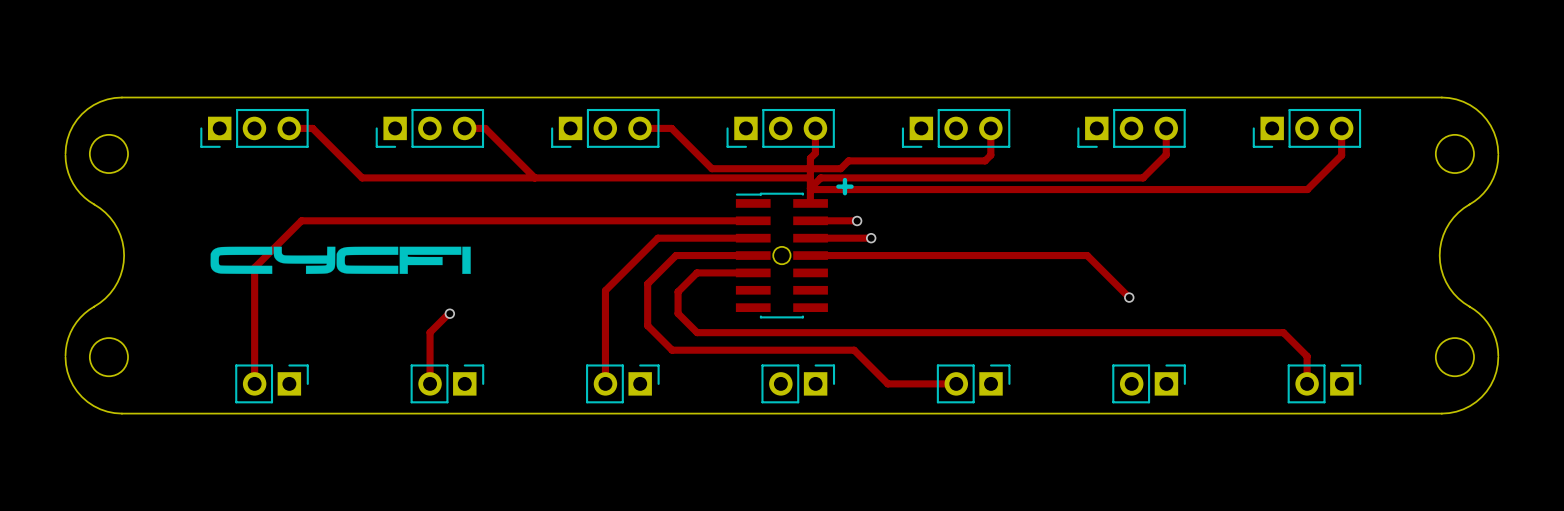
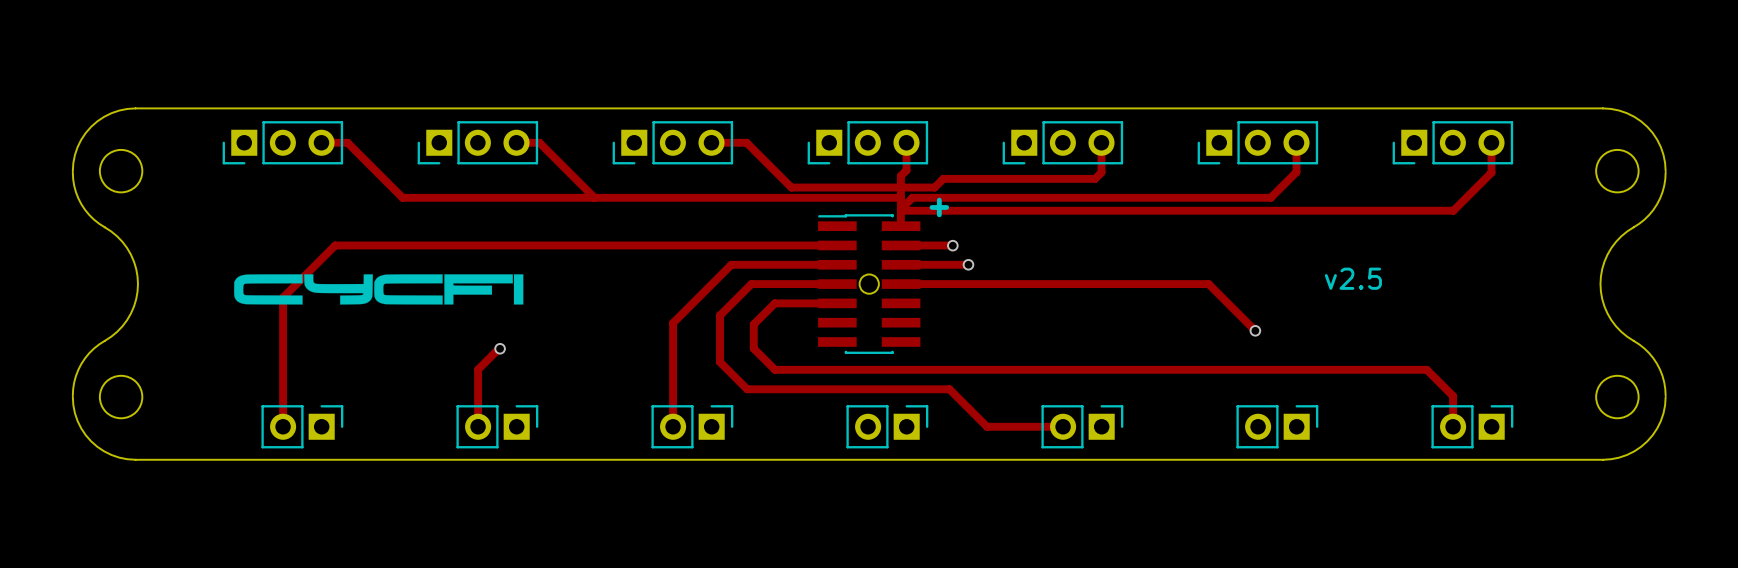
text: none -> v2.5 (1353, 278)

